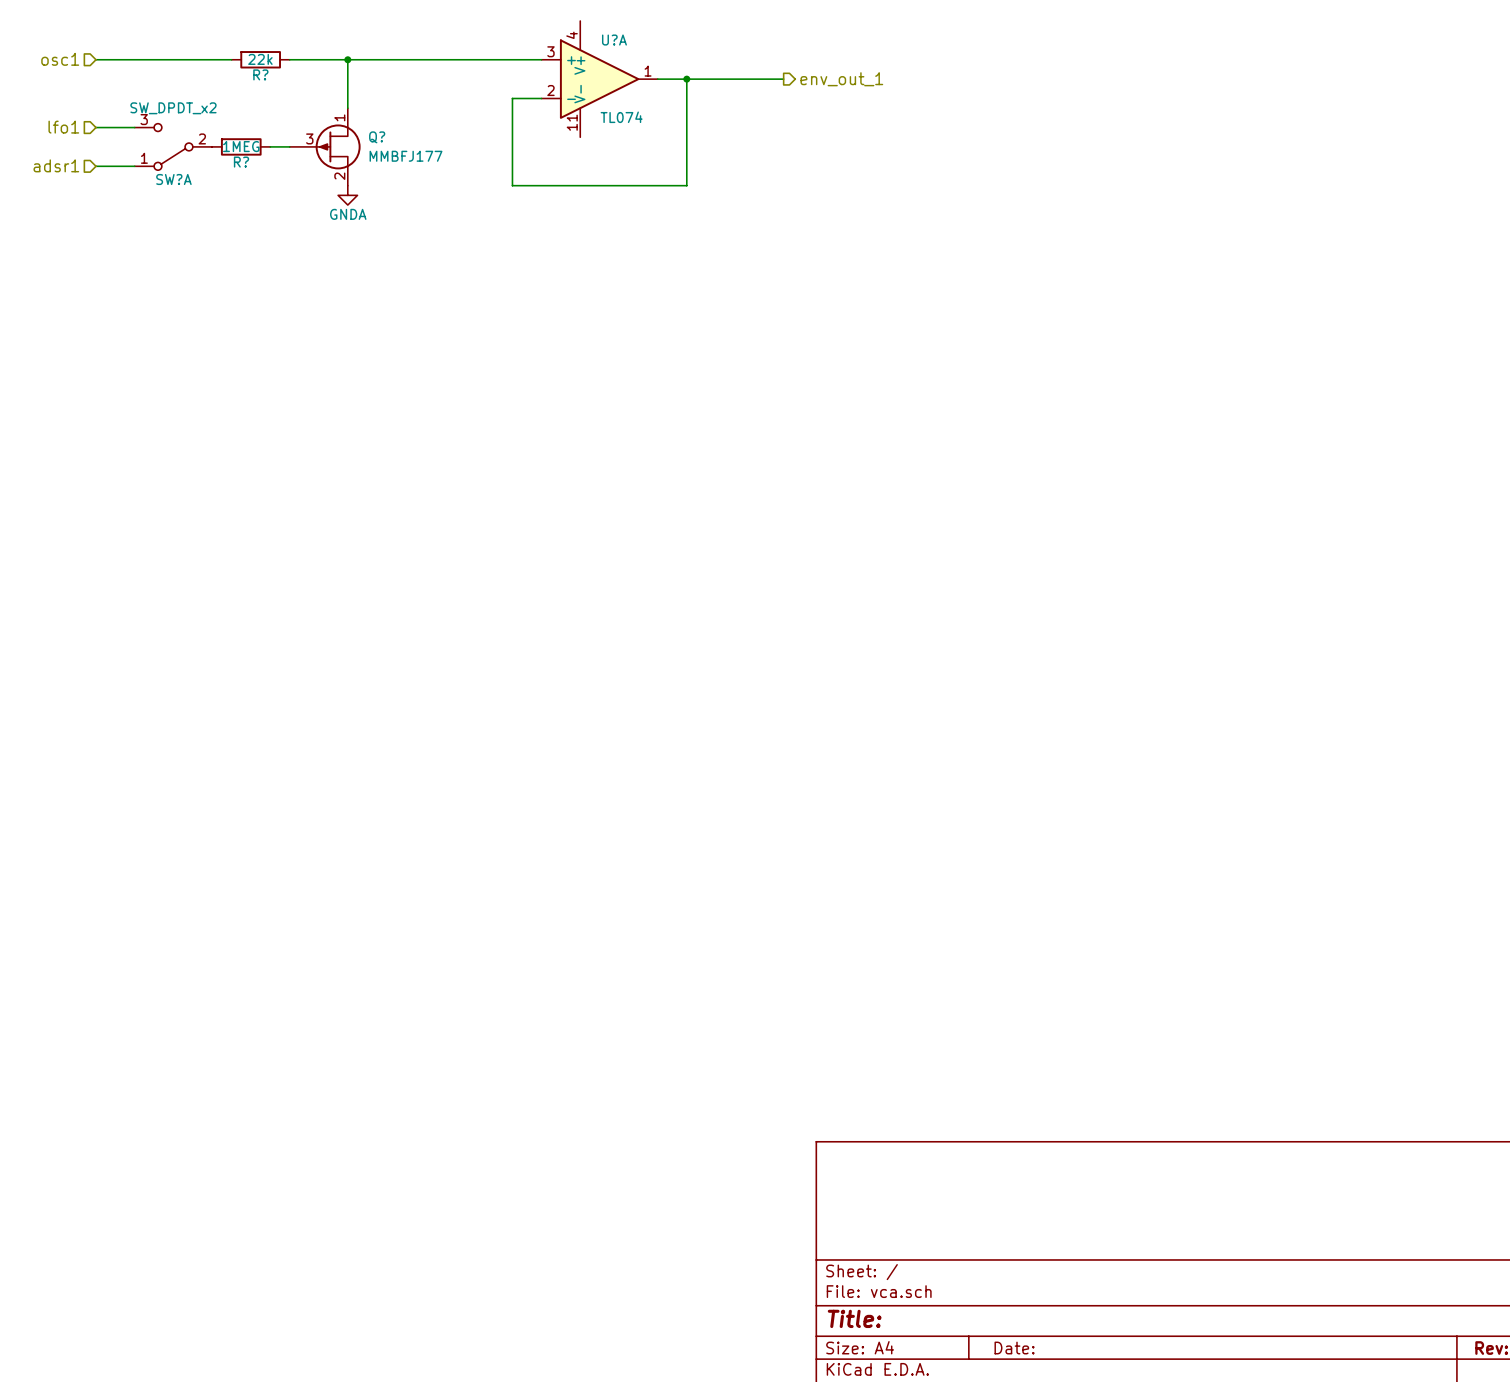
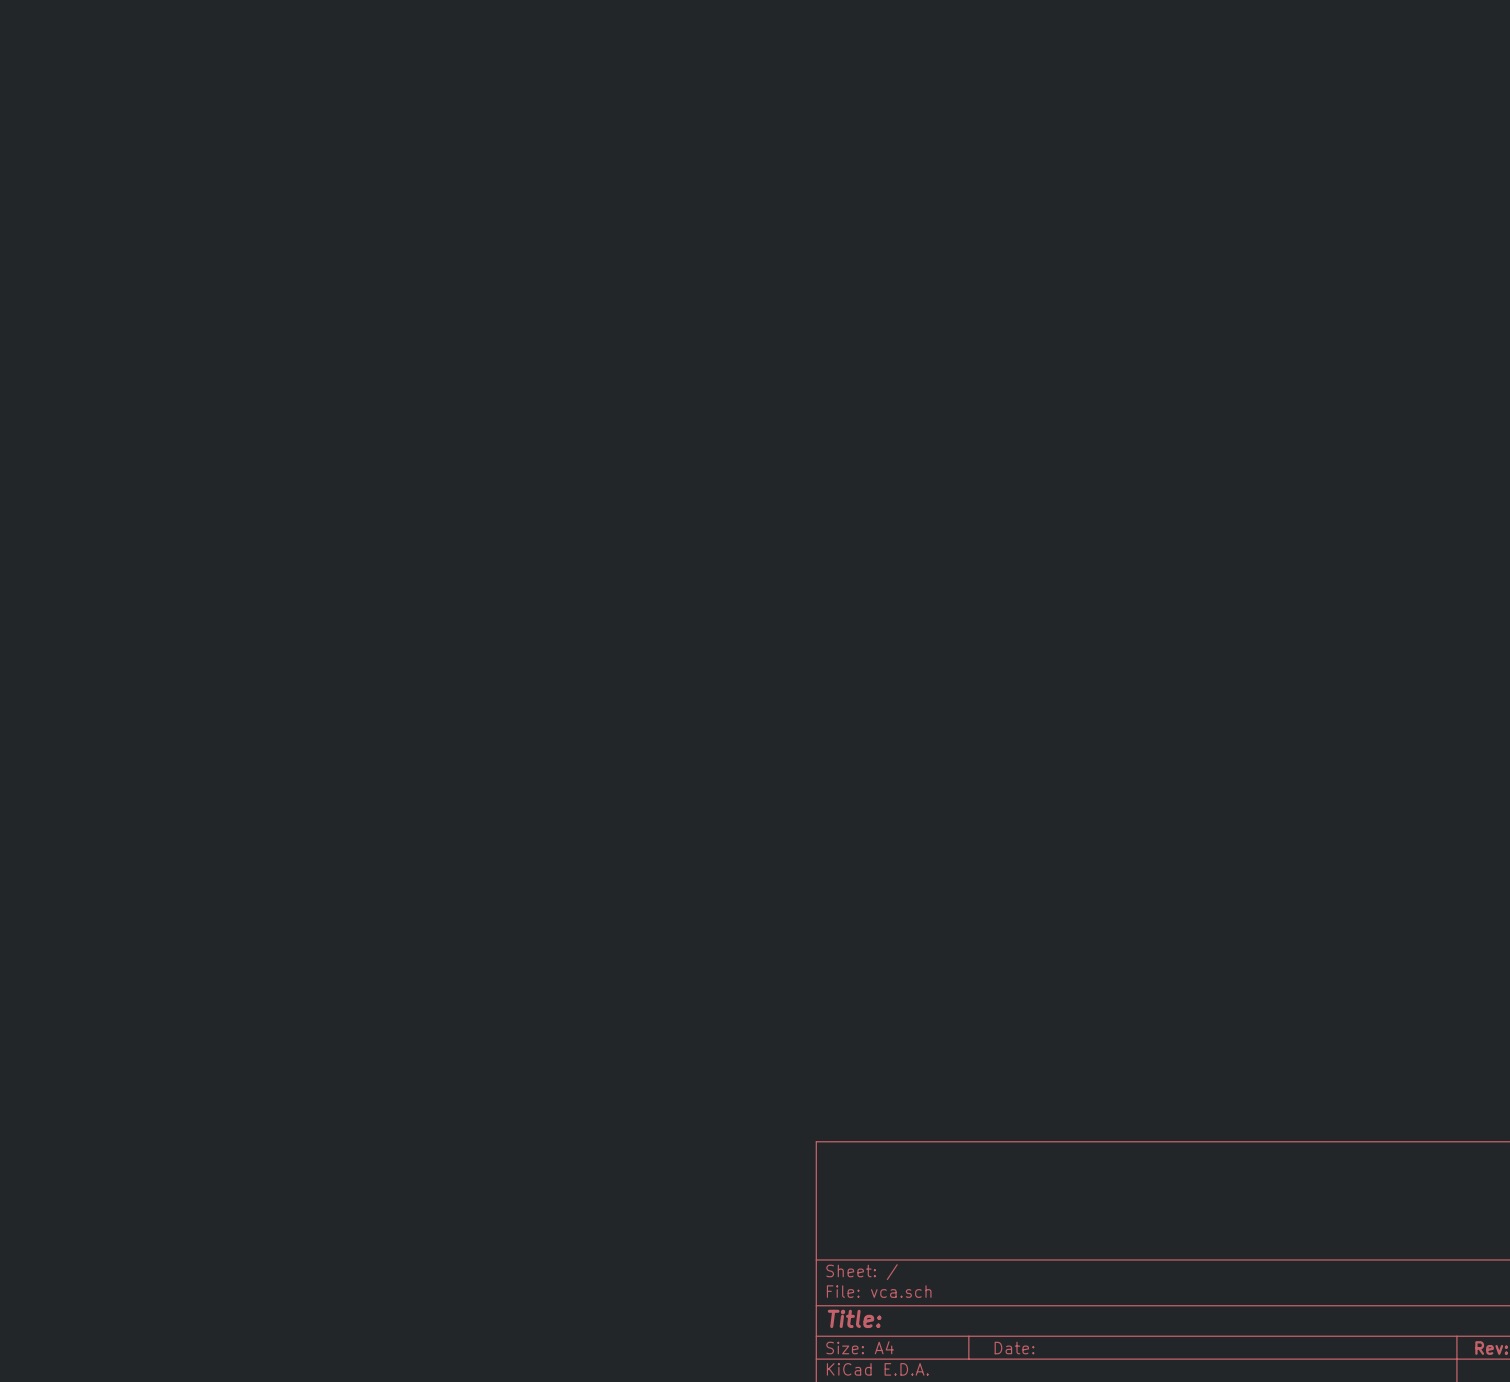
hierarchical label: osc1 (60, 59) -> none
wire: (95, 59) (231, 59) -> none
R?: 22k (260, 59) -> none
wire: (289, 59) (541, 59) -> none
wire: (347, 59) (347, 108) -> none
junction: (347, 59) -> none
U?A: TL074 (599, 79) -> none
wire: (657, 79) (783, 79) -> none
wire: (686, 79) (686, 185) (512, 185) (512, 98) (541, 98) -> none
junction: (686, 79) -> none
hierarchical label: env_out_1 (841, 79) -> none
hierarchical label: lfo1 (63, 127) -> none
wire: (95, 127) (134, 127) -> none
SW?A: SW_DPDT_x2 (173, 146) -> none
R?: 1MEG (241, 146) -> none
wire: (270, 146) (289, 146) -> none
Q?: MMBFJ177 (325, 146) -> none
hierarchical label: adsr1 (56, 165) -> none
wire: (95, 166) (134, 166) -> none
power symbol: GNDA (347, 195) -> none

